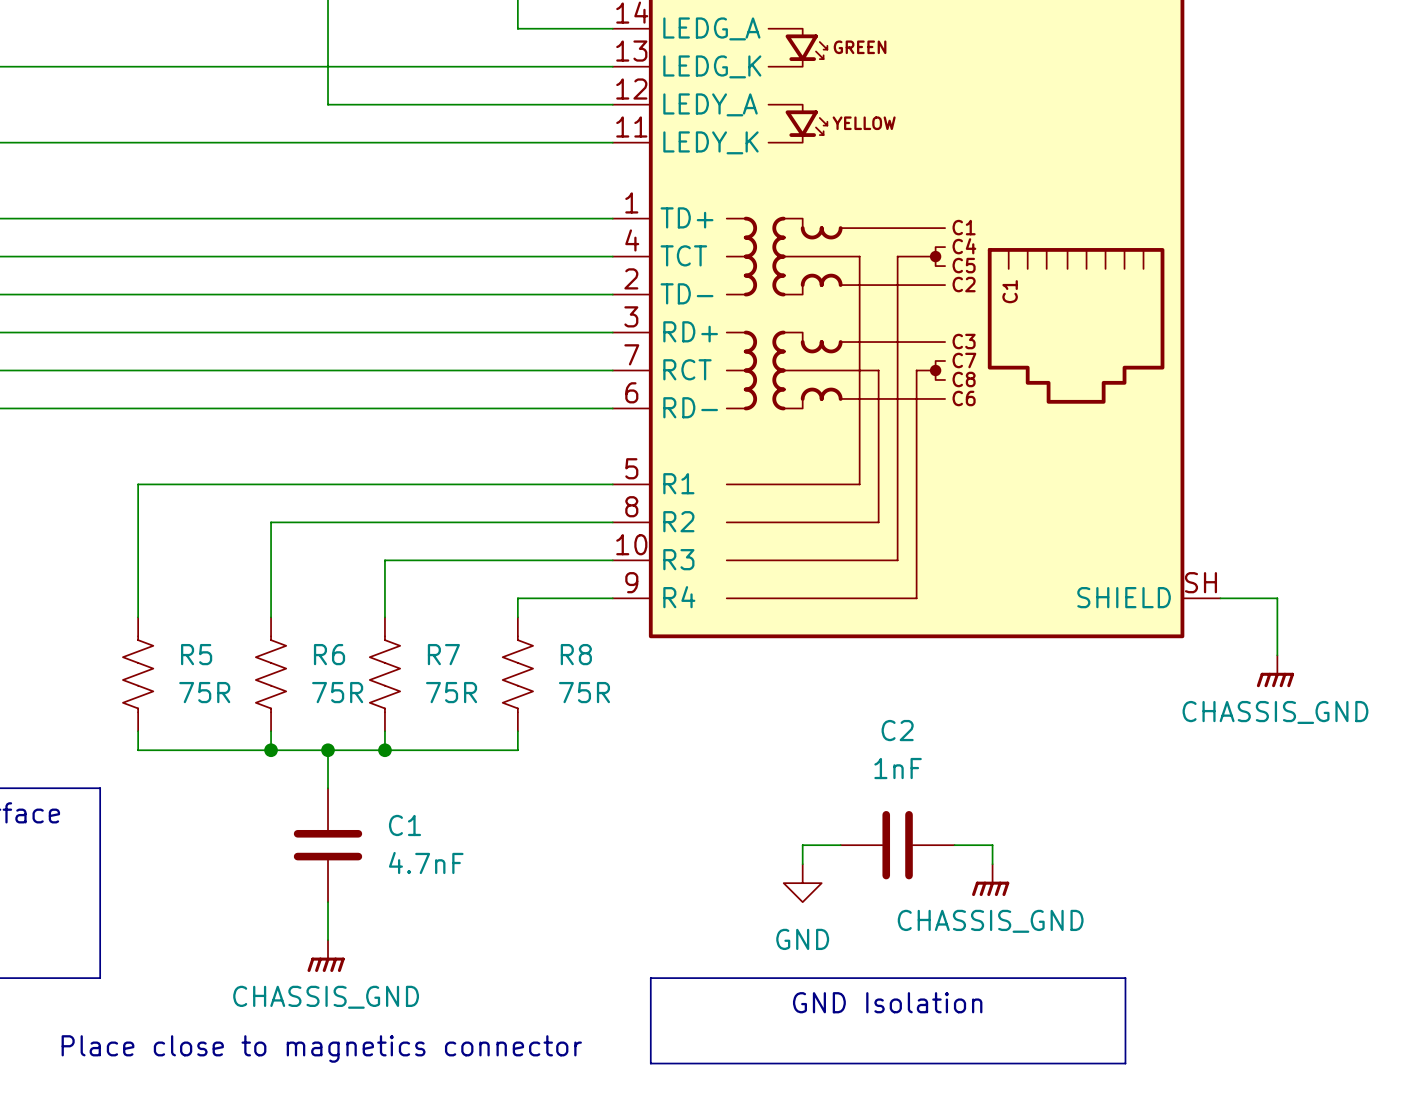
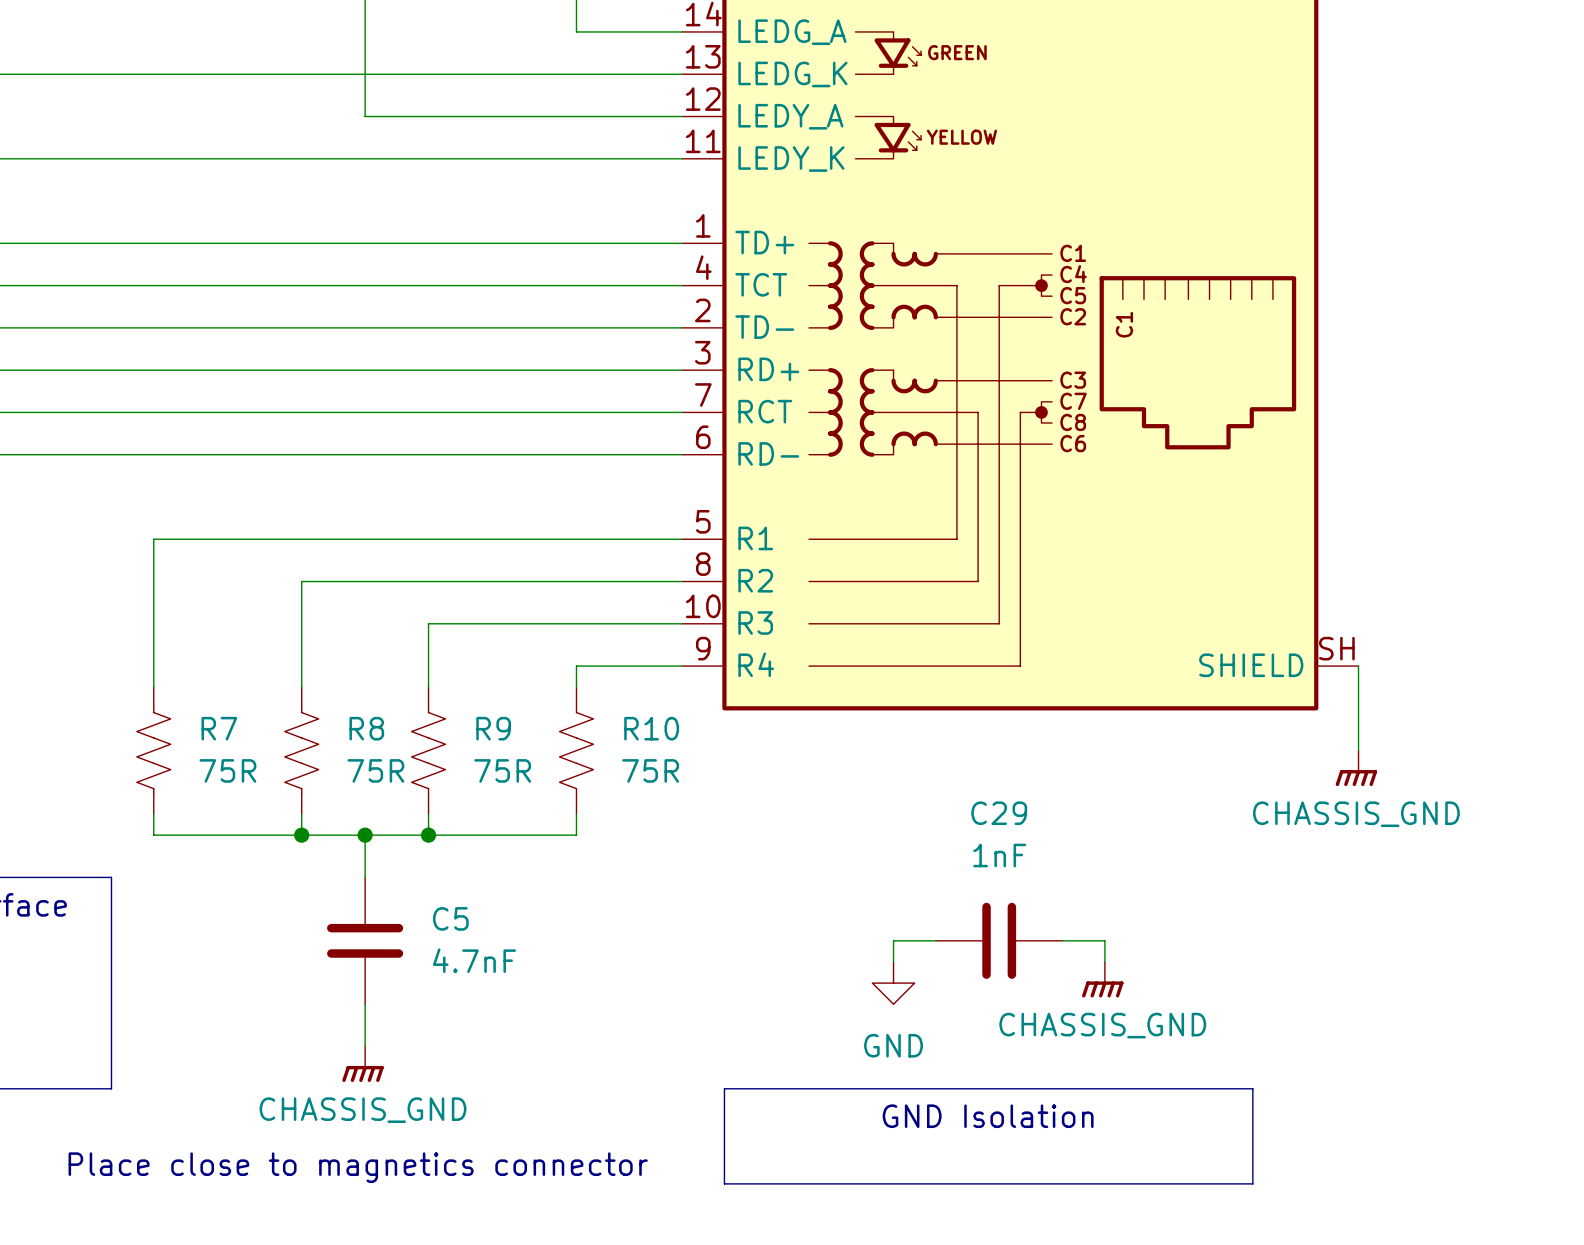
wire: (1220, 598) (1277, 598) (1277, 655) -> (1358, 666) (1358, 750)
R5 name: R5 (196, 654) -> R7 (219, 728)
R6 name: R6 (329, 654) -> R8 (366, 728)
R7 name: R7 (443, 654) -> R9 (493, 728)
R8 name: R8 (576, 654) -> R10 (651, 728)
power symbol position: CHASSIS_GND (1275, 671) -> CHASSIS_GND (1356, 768)
C2 name: C2 (897, 730) -> C29 (999, 813)
C1 name: C1 (405, 825) -> C5 (450, 918)

